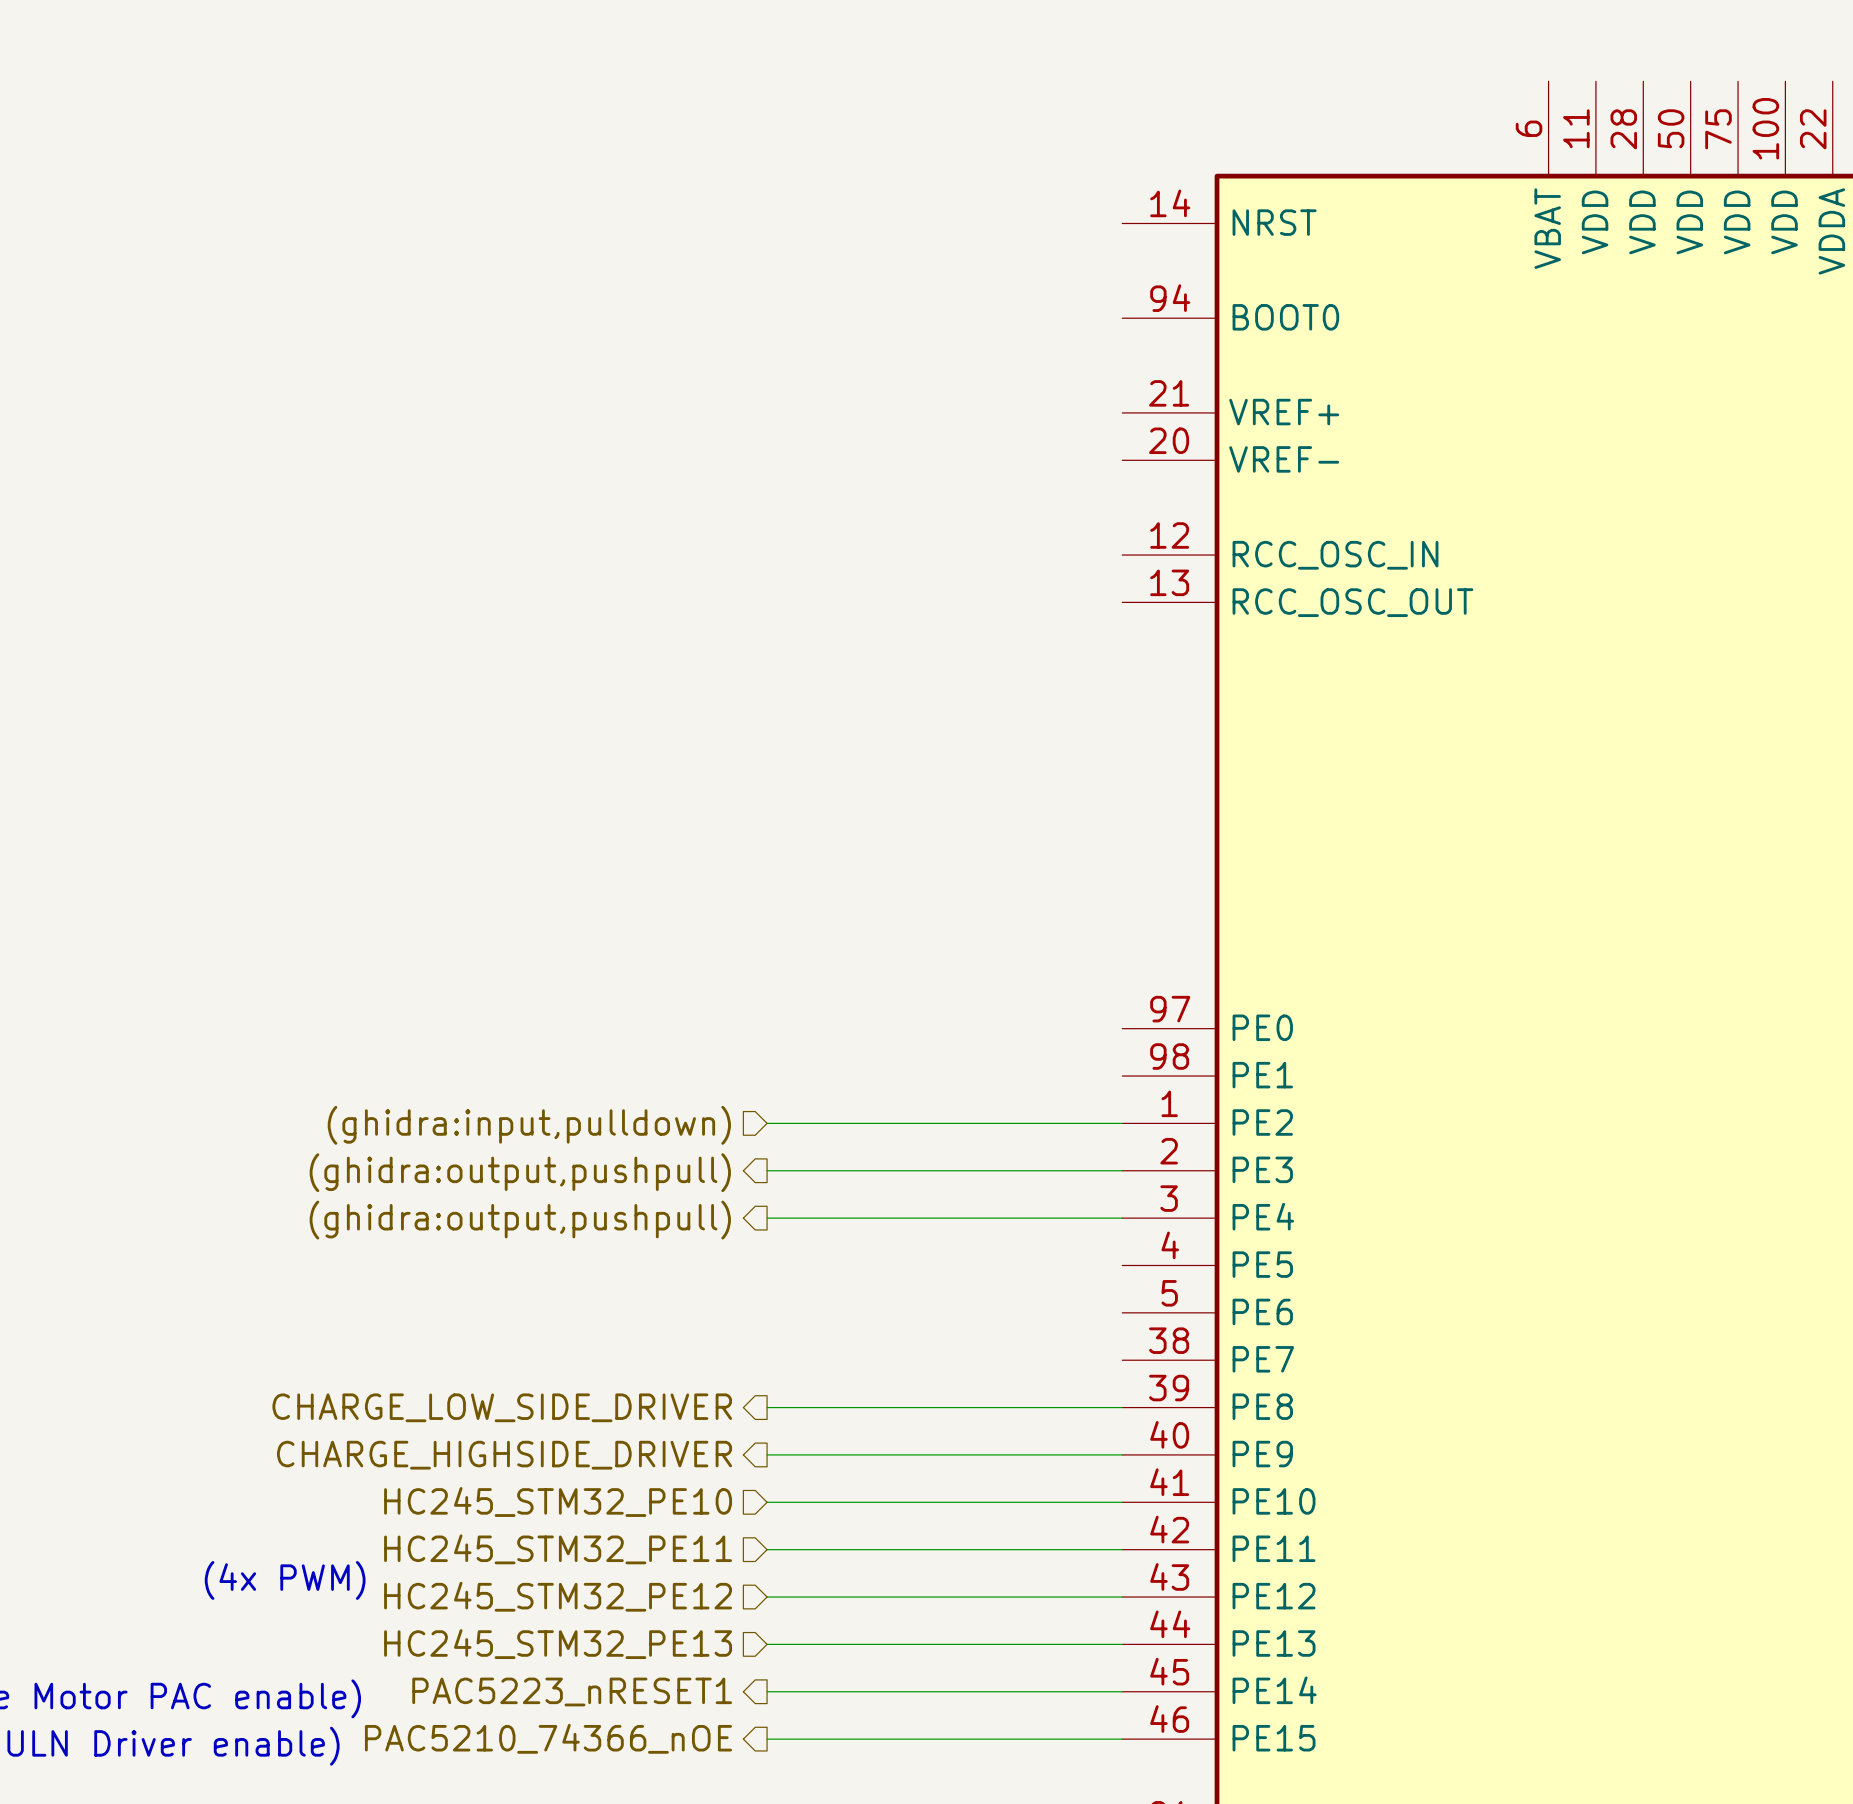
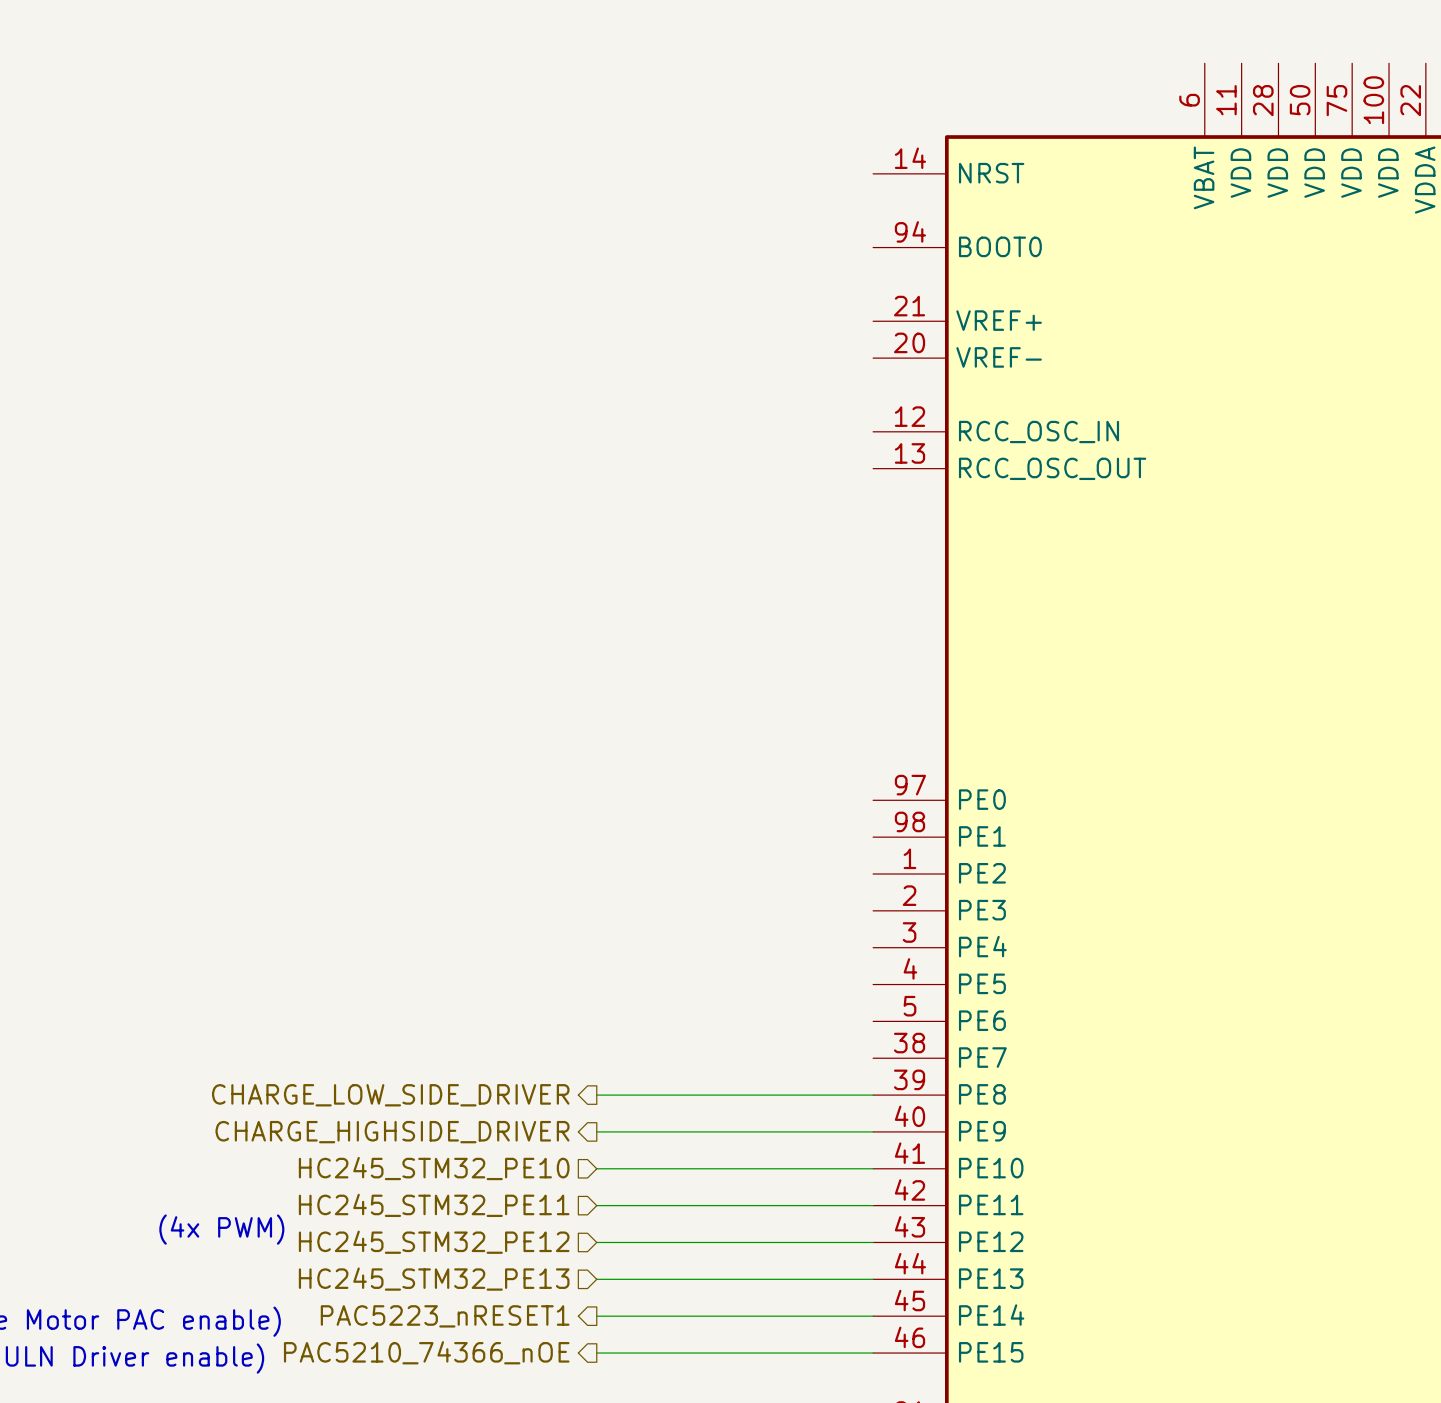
wire: (767, 1123) (1122, 1123) -> none
hierarchical label: (ghidra:input,pulldown) (529, 1125) -> none
wire: (767, 1170) (1122, 1170) -> none
hierarchical label: (ghidra:output,pushpull) (520, 1172) -> none
wire: (767, 1218) (1122, 1218) -> none
hierarchical label: (ghidra:output,pushpull) (520, 1220) -> none

